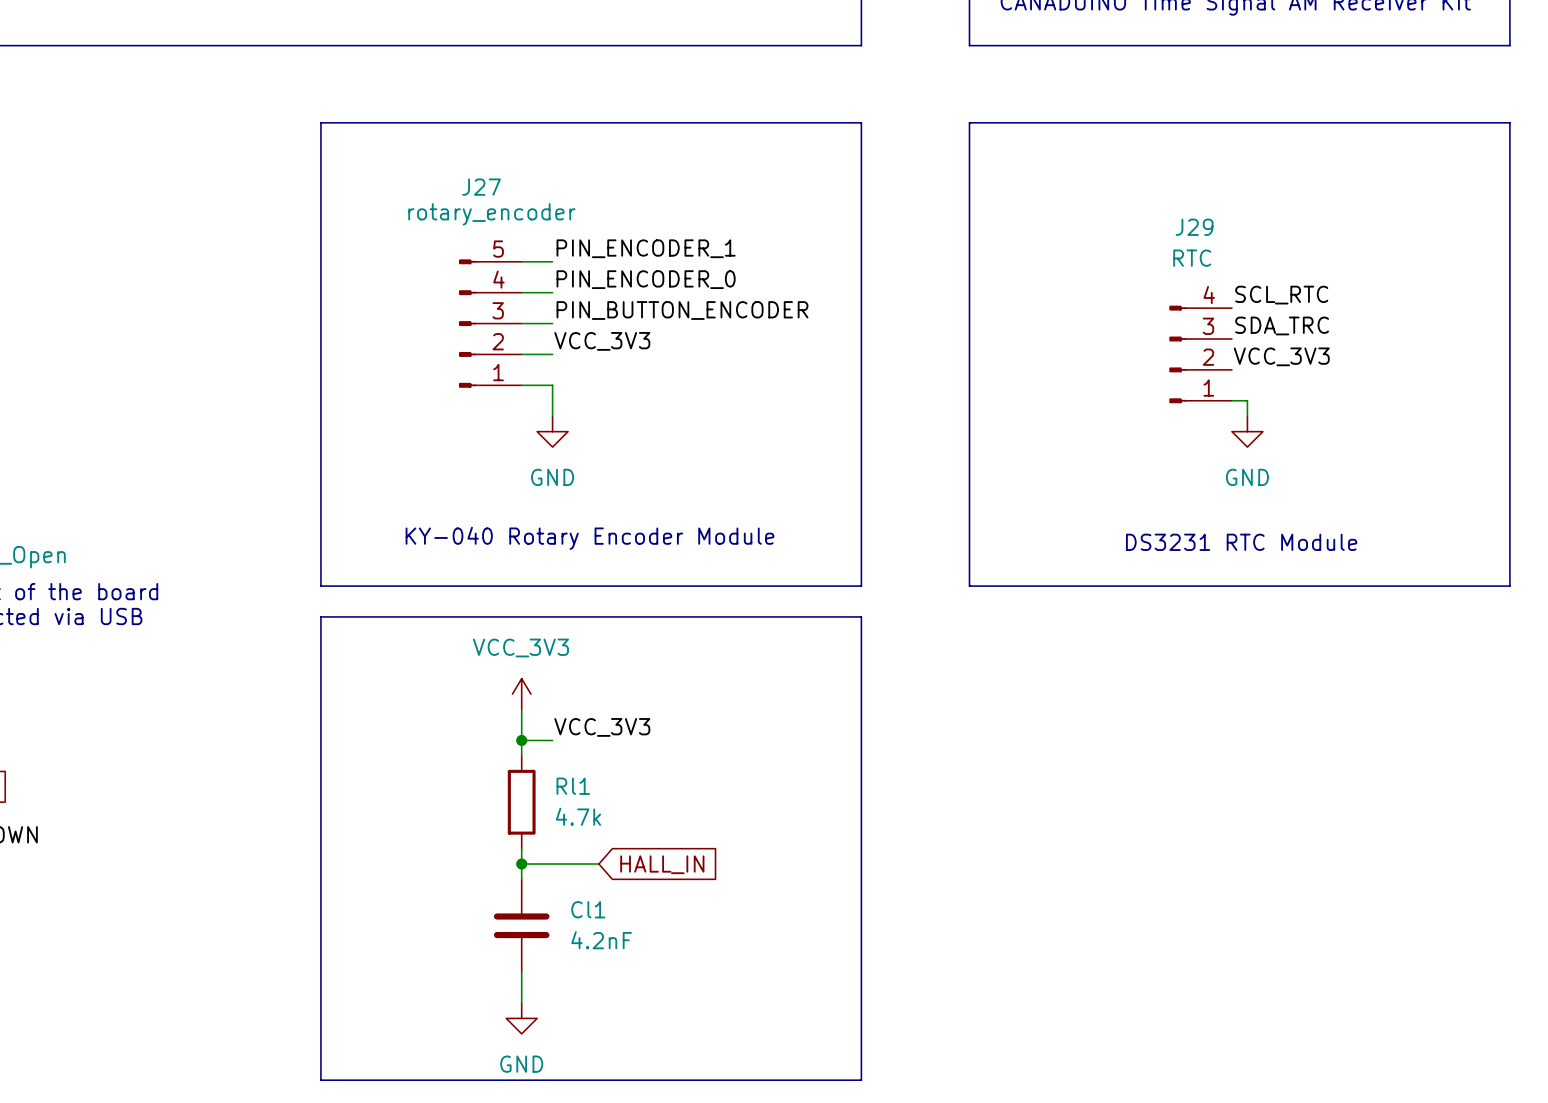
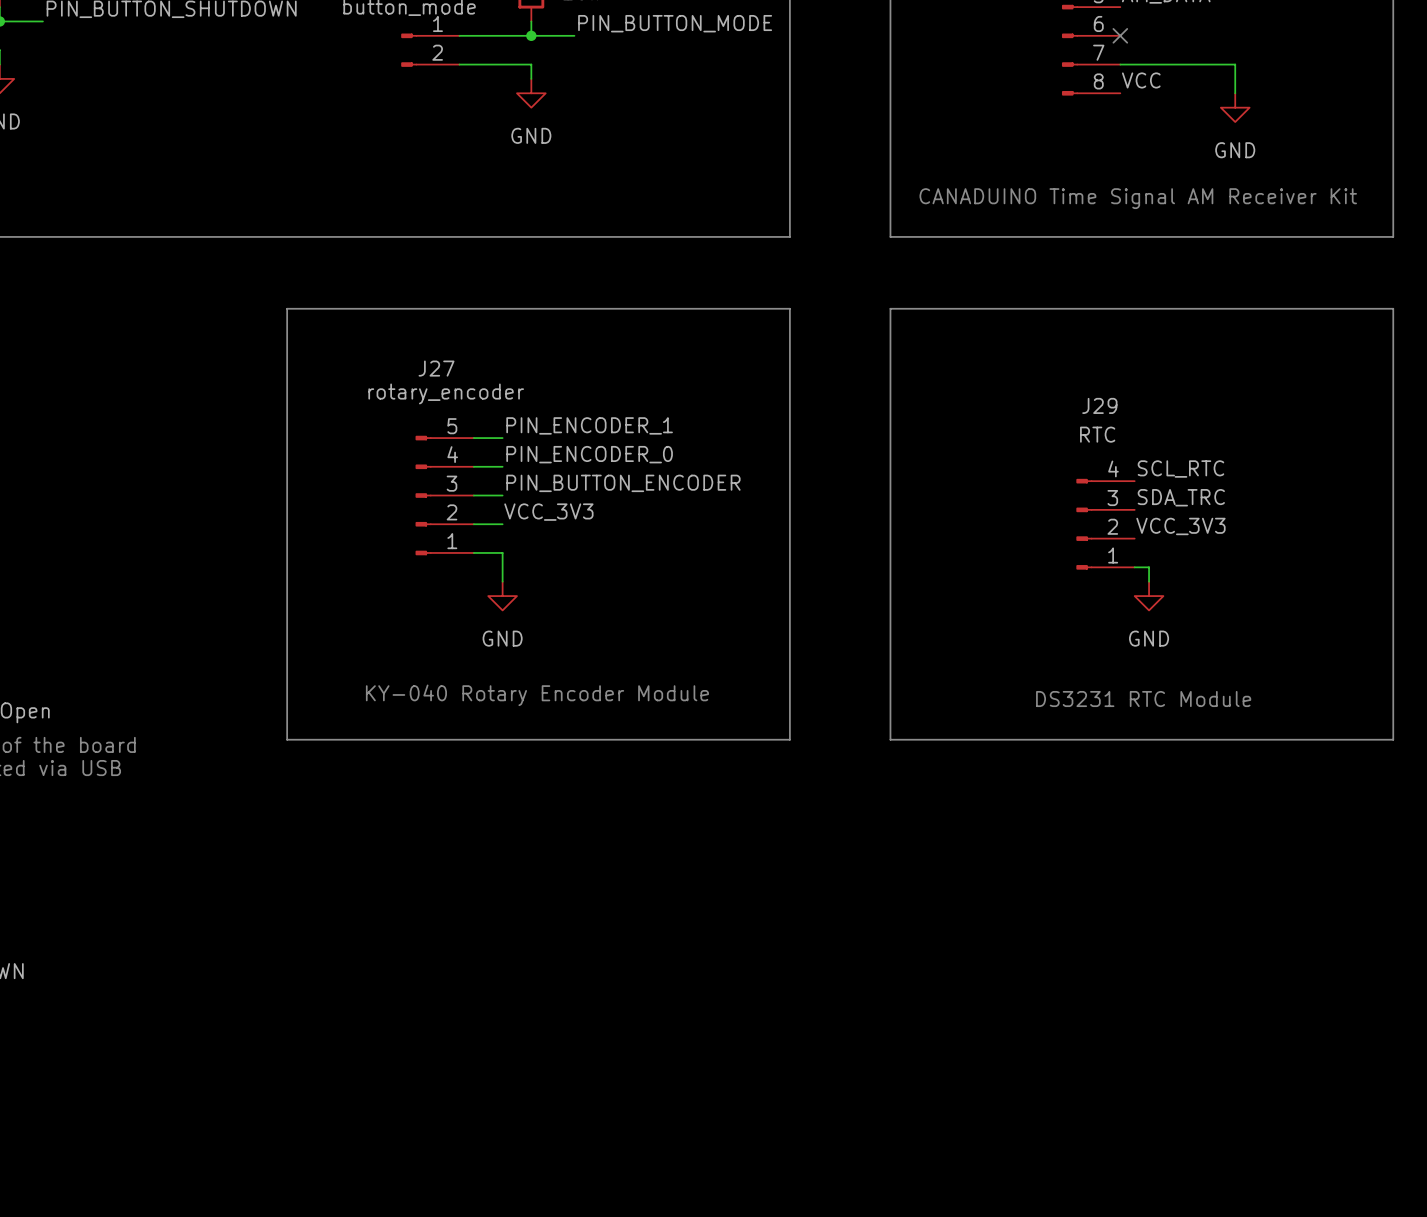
line: (320, 616) (861, 616) (861, 1080) (320, 1080) (320, 616) -> none
power symbol: VCC_3V3 (521, 694) -> none
wire: (521, 709) (521, 755) -> none
label: VCC_3V3 (602, 727) -> none
wire: (521, 740) (552, 740) -> none
junction: (521, 740) -> none
Rl1: 4.7k (521, 802) -> none
wire: (521, 848) (521, 879) -> none
wire: (521, 864) (598, 864) -> none
junction: (521, 864) -> none
global label: HALL_IN (662, 864) -> none
Cl1: 4.2nF (521, 925) -> none
wire: (521, 972) (521, 1002) -> none
power symbol: GND (521, 1018) -> none

